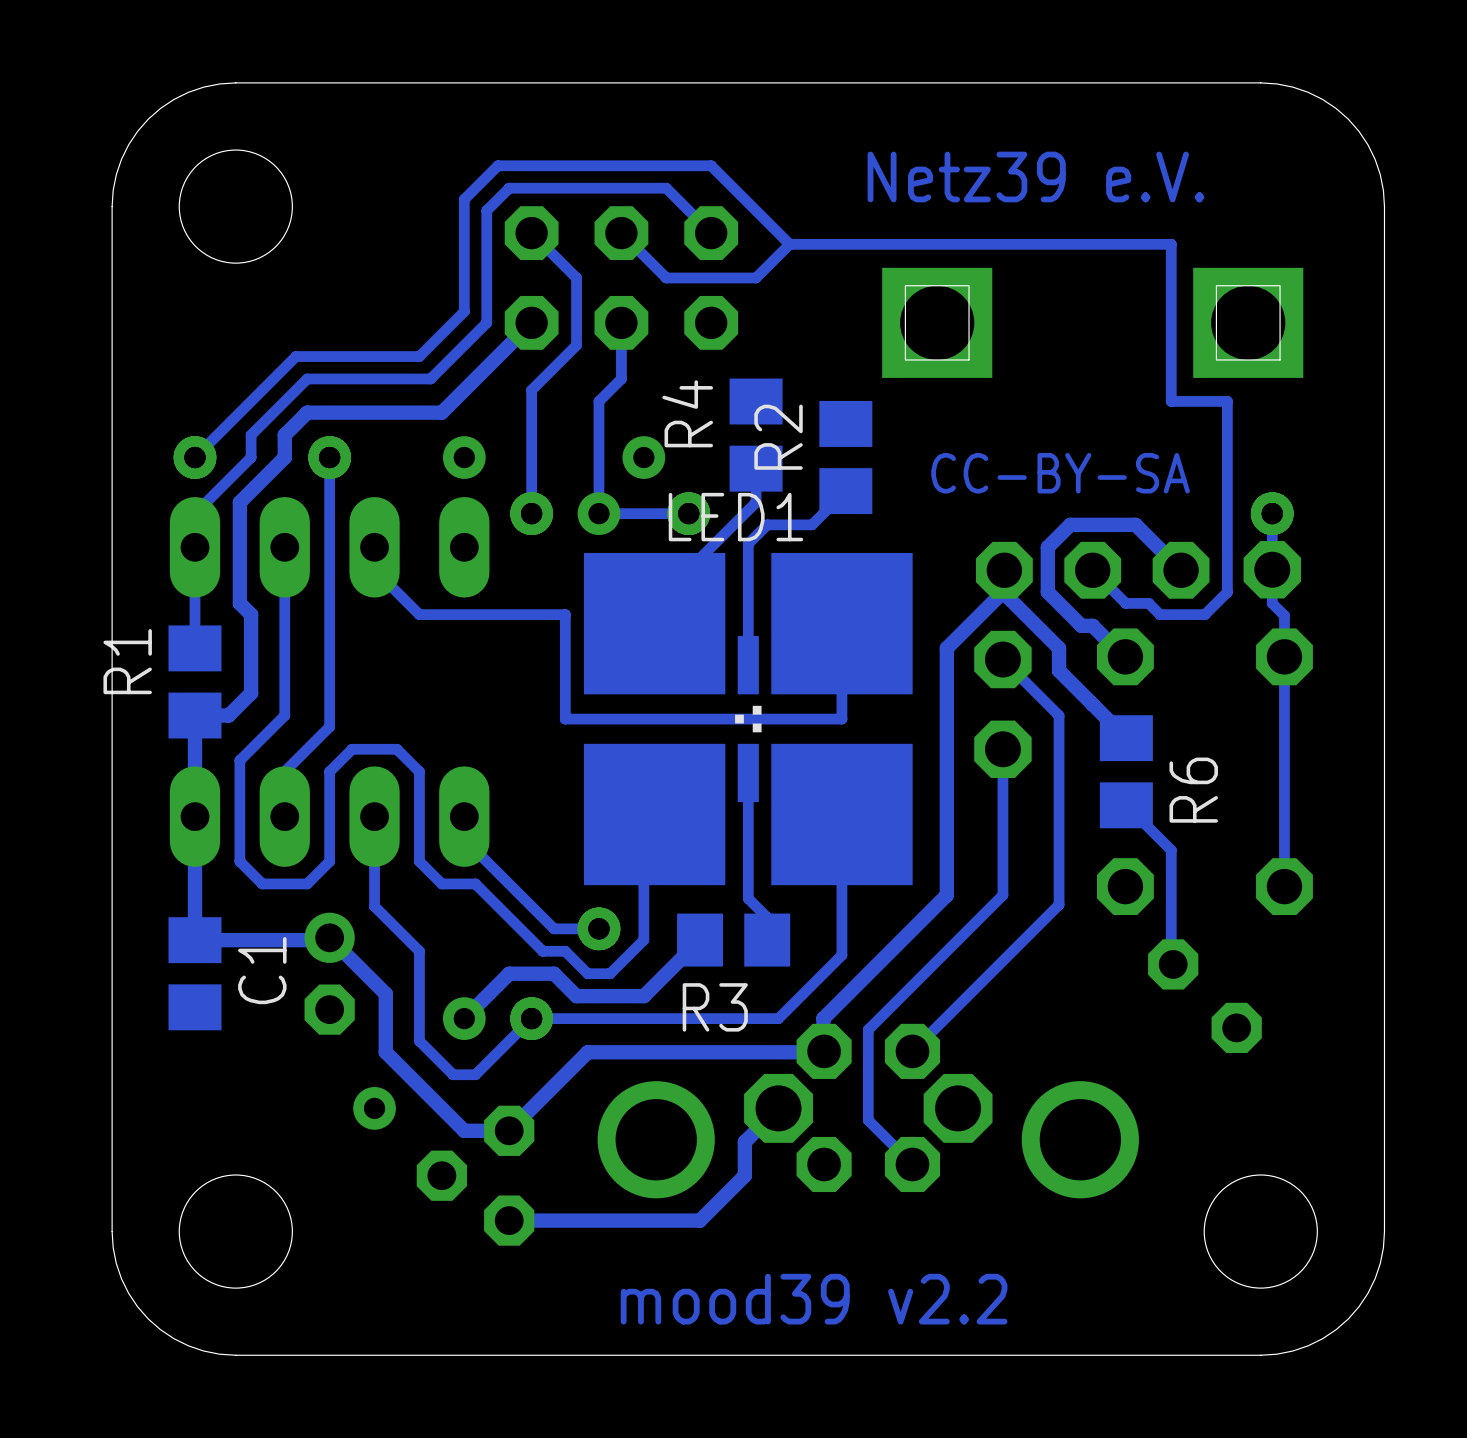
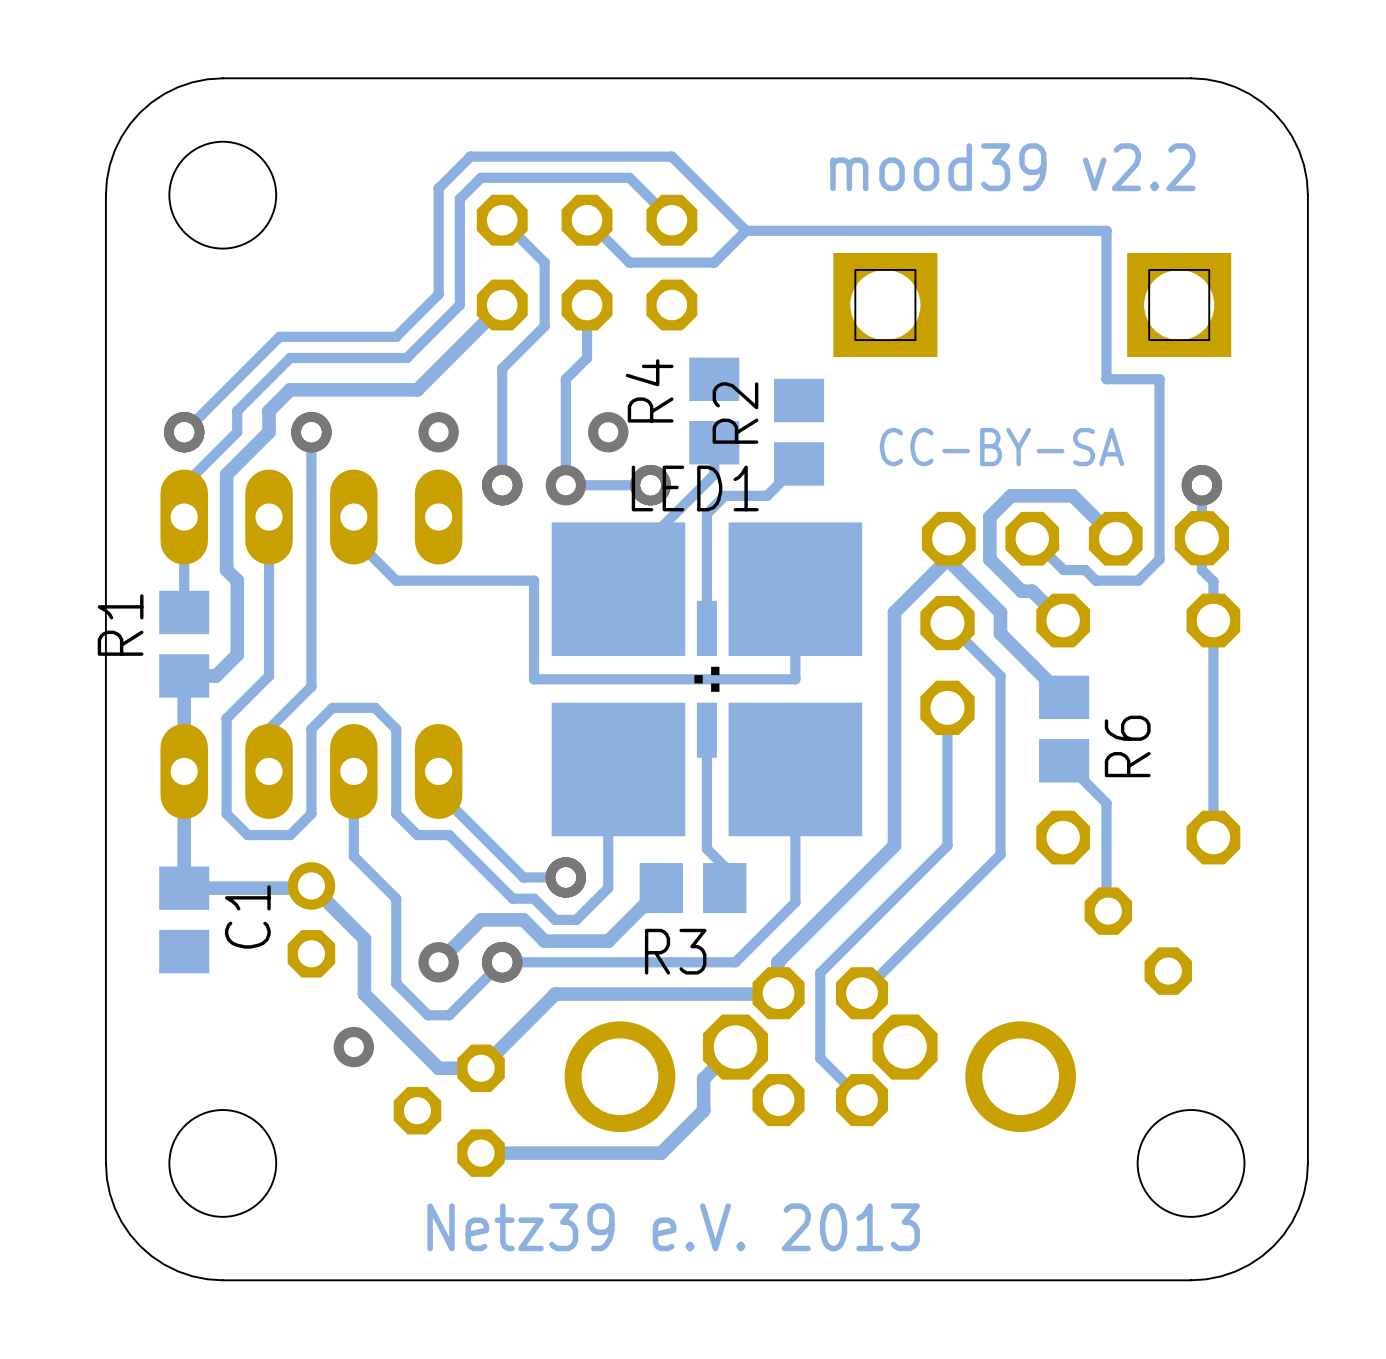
text: Netz39 e.V. (1035, 176) -> mood39 v2.2 (1012, 167)
text: none -> Netz39 e.V. 2013 (673, 1227)
text: mood39 v2.2 (814, 1299) -> none

